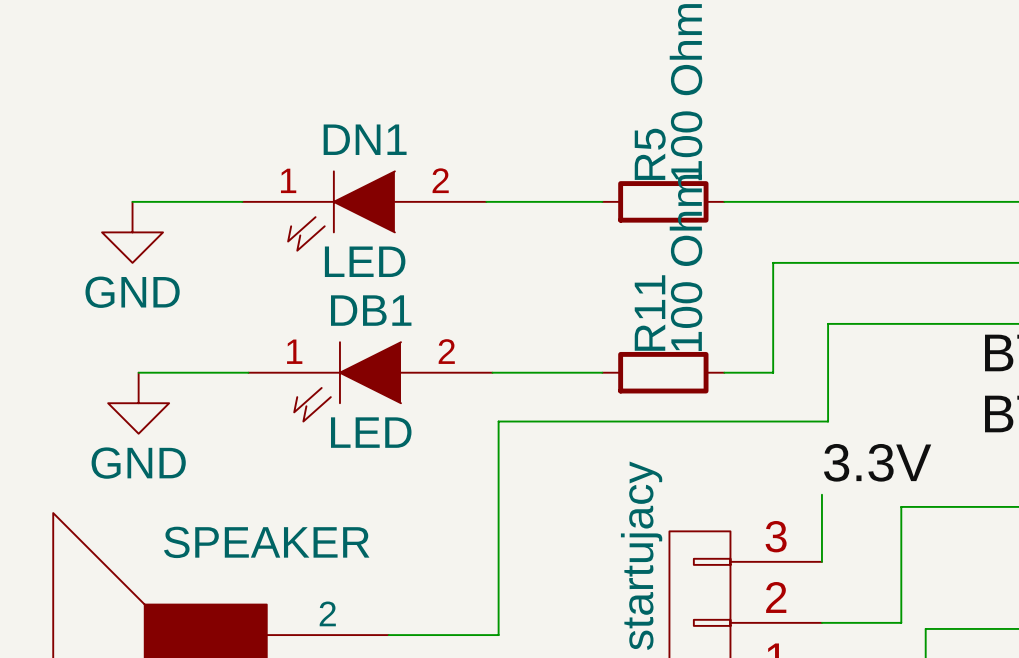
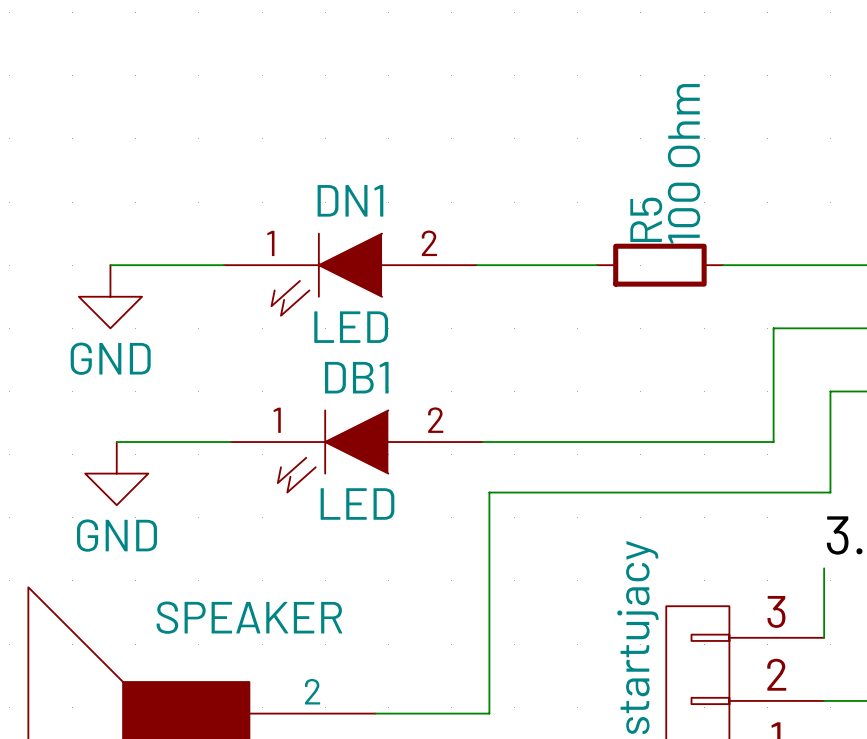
wire: none -> (596, 442) (723, 442)
R11: 100 Ohm (663, 372) -> none

